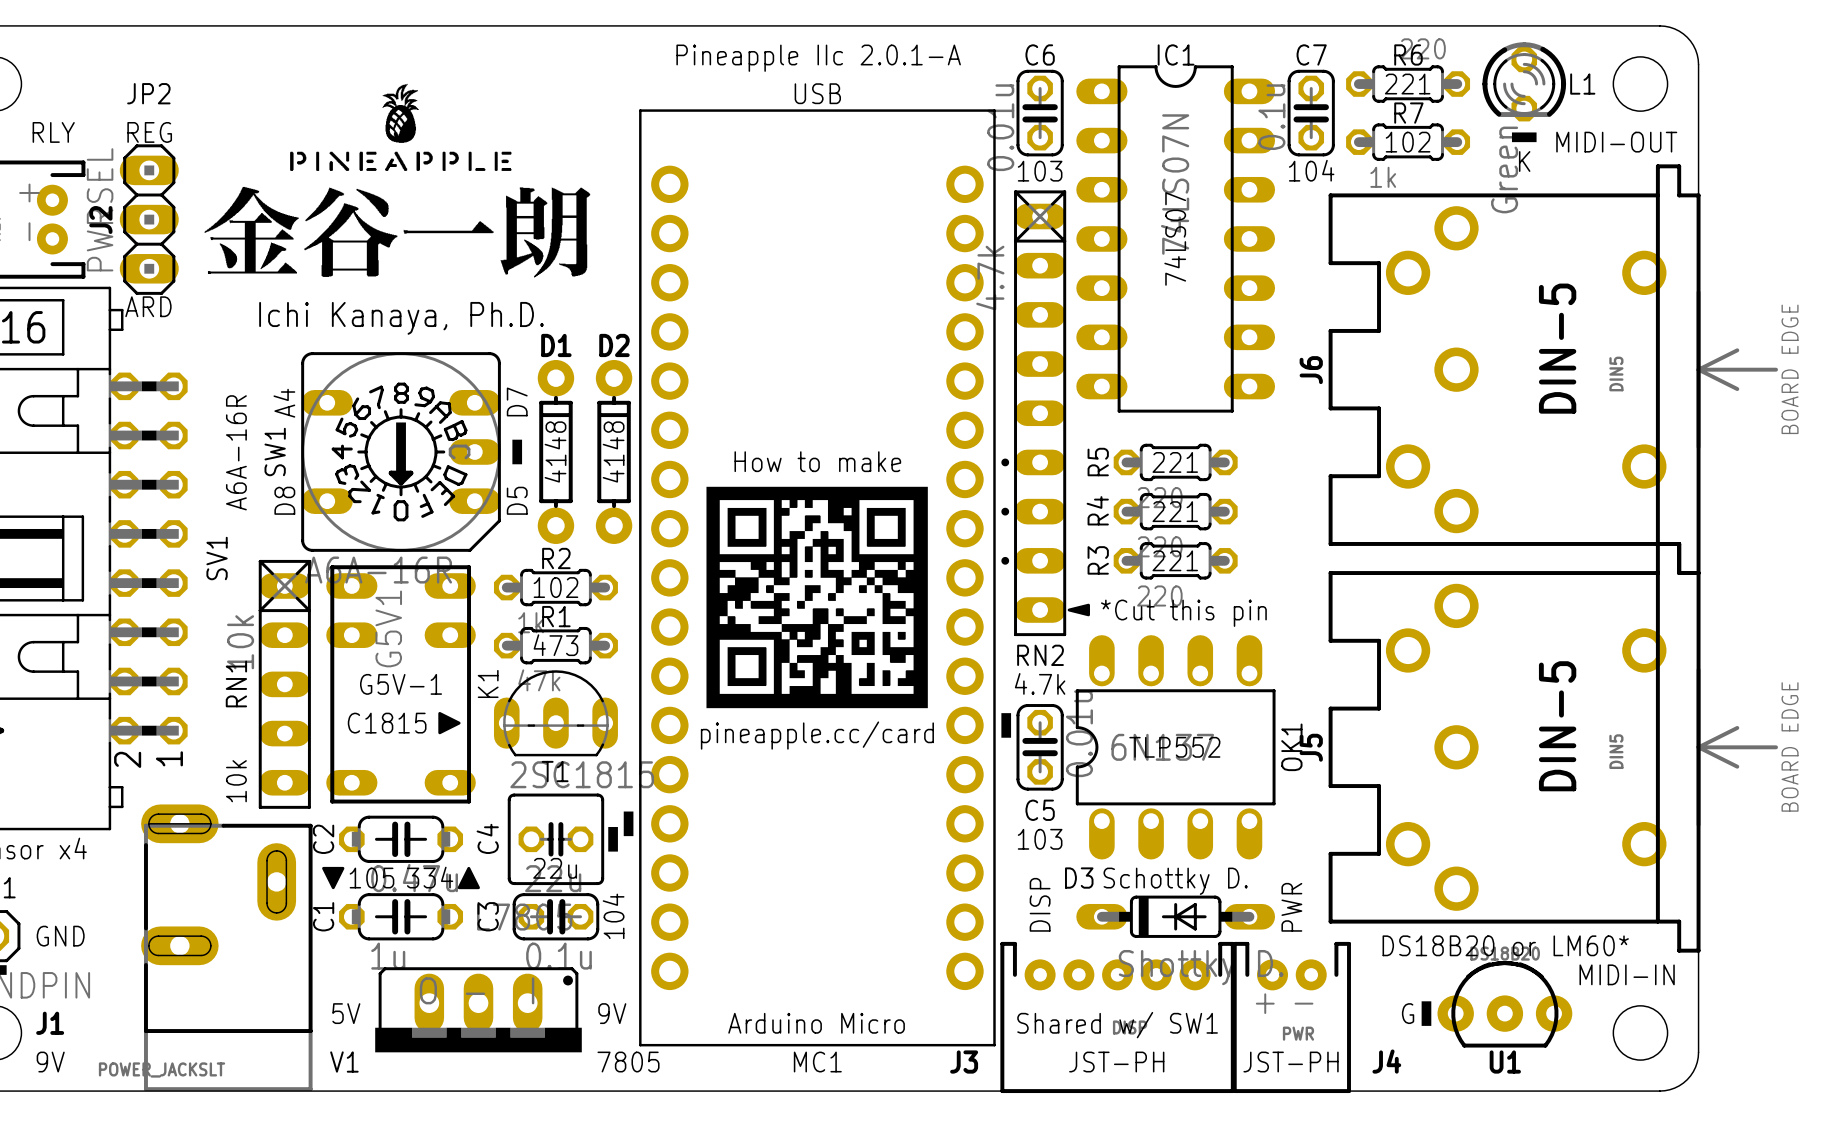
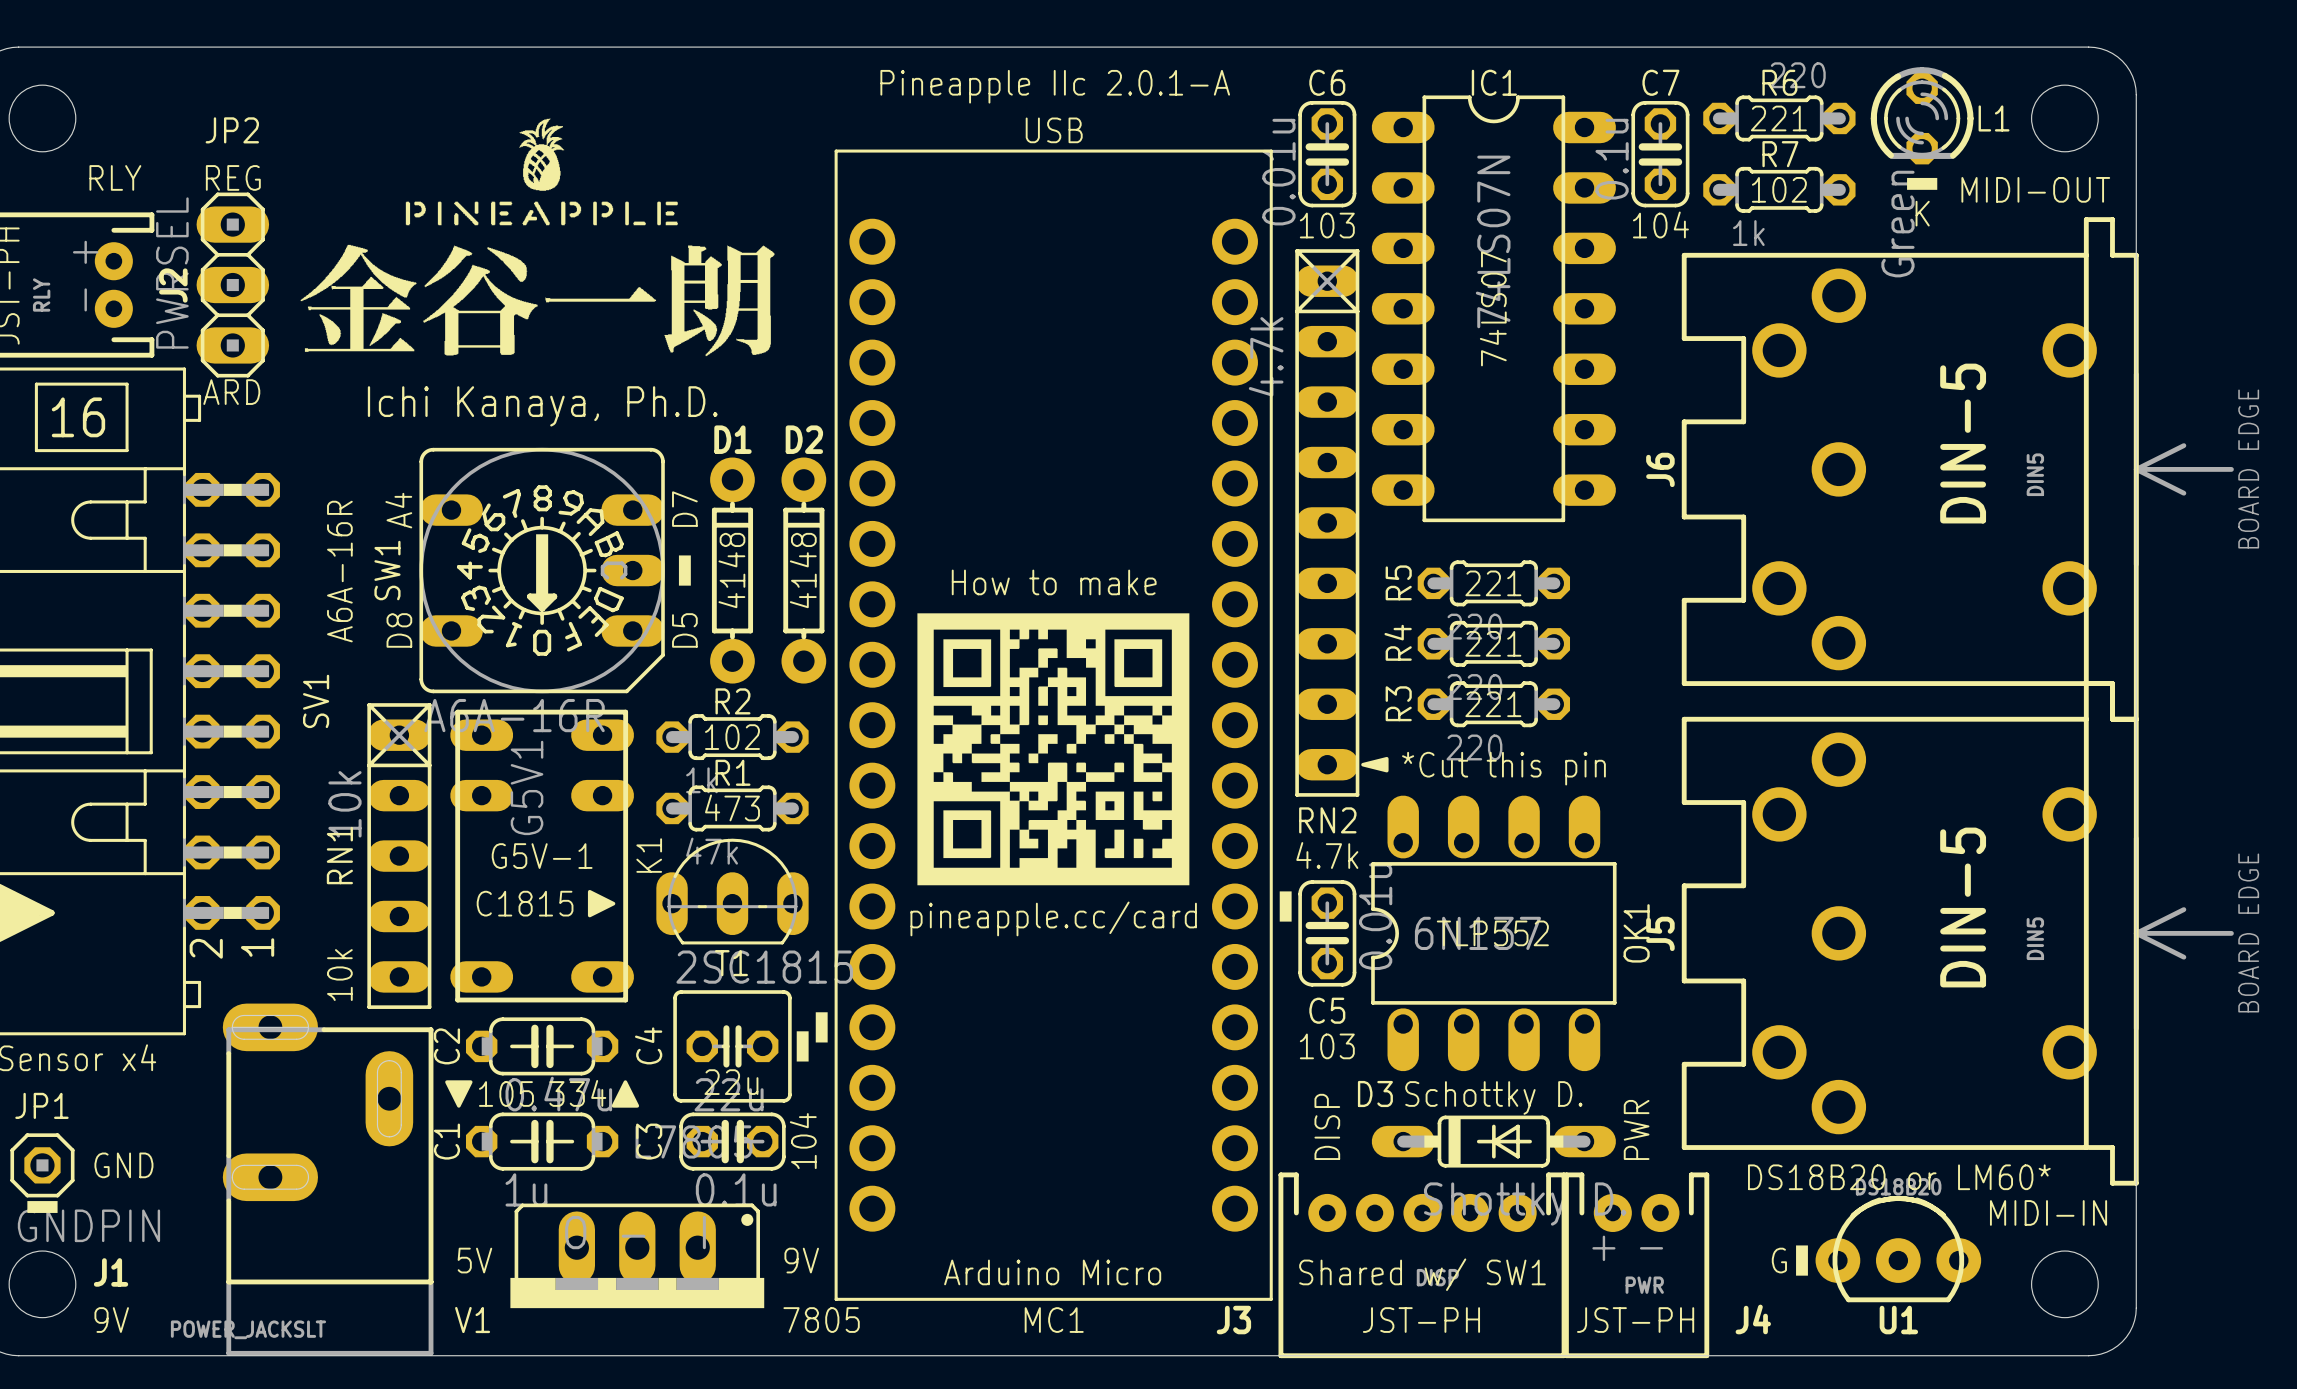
drawing: [1001, 458, 1010, 467] -> none
drawing: [1001, 507, 1010, 516] -> none
drawing: [1001, 556, 1010, 565] -> none

